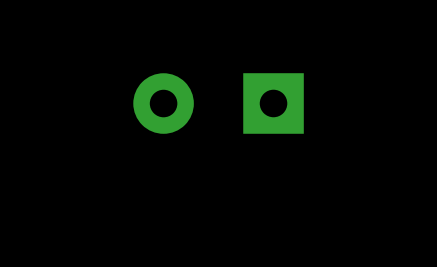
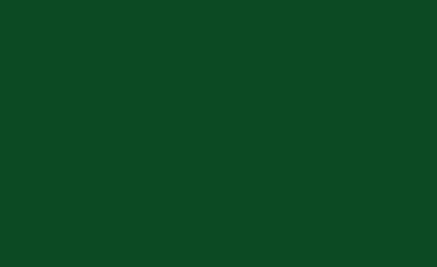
part: (218, 103) -> none

